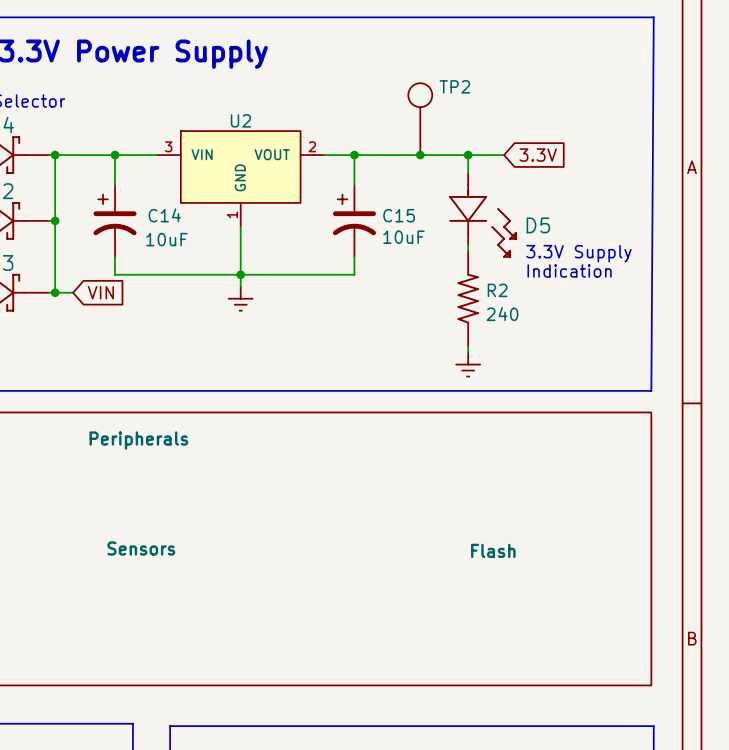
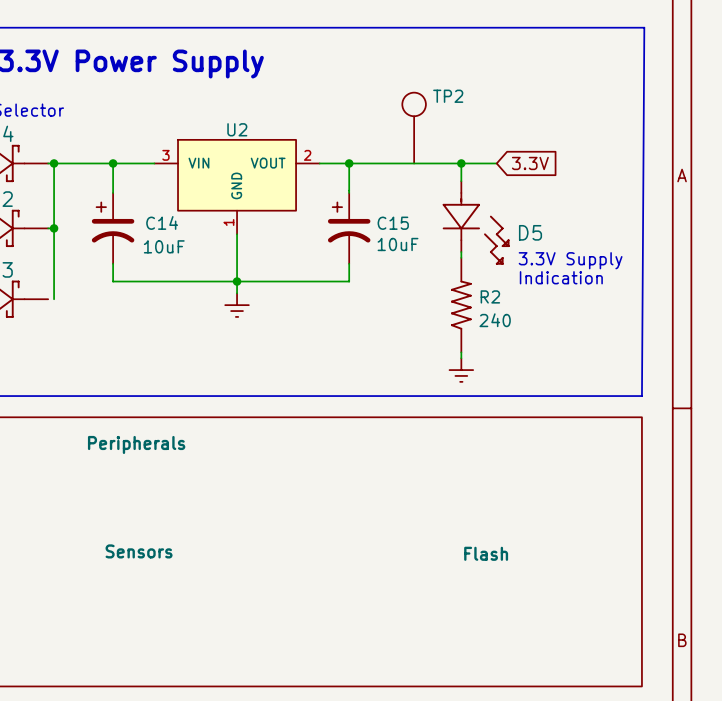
junction: (420, 155) -> none
wire: (49, 292) (73, 292) -> none
junction: (55, 292) -> none
global label: VIN (100, 292) -> none

